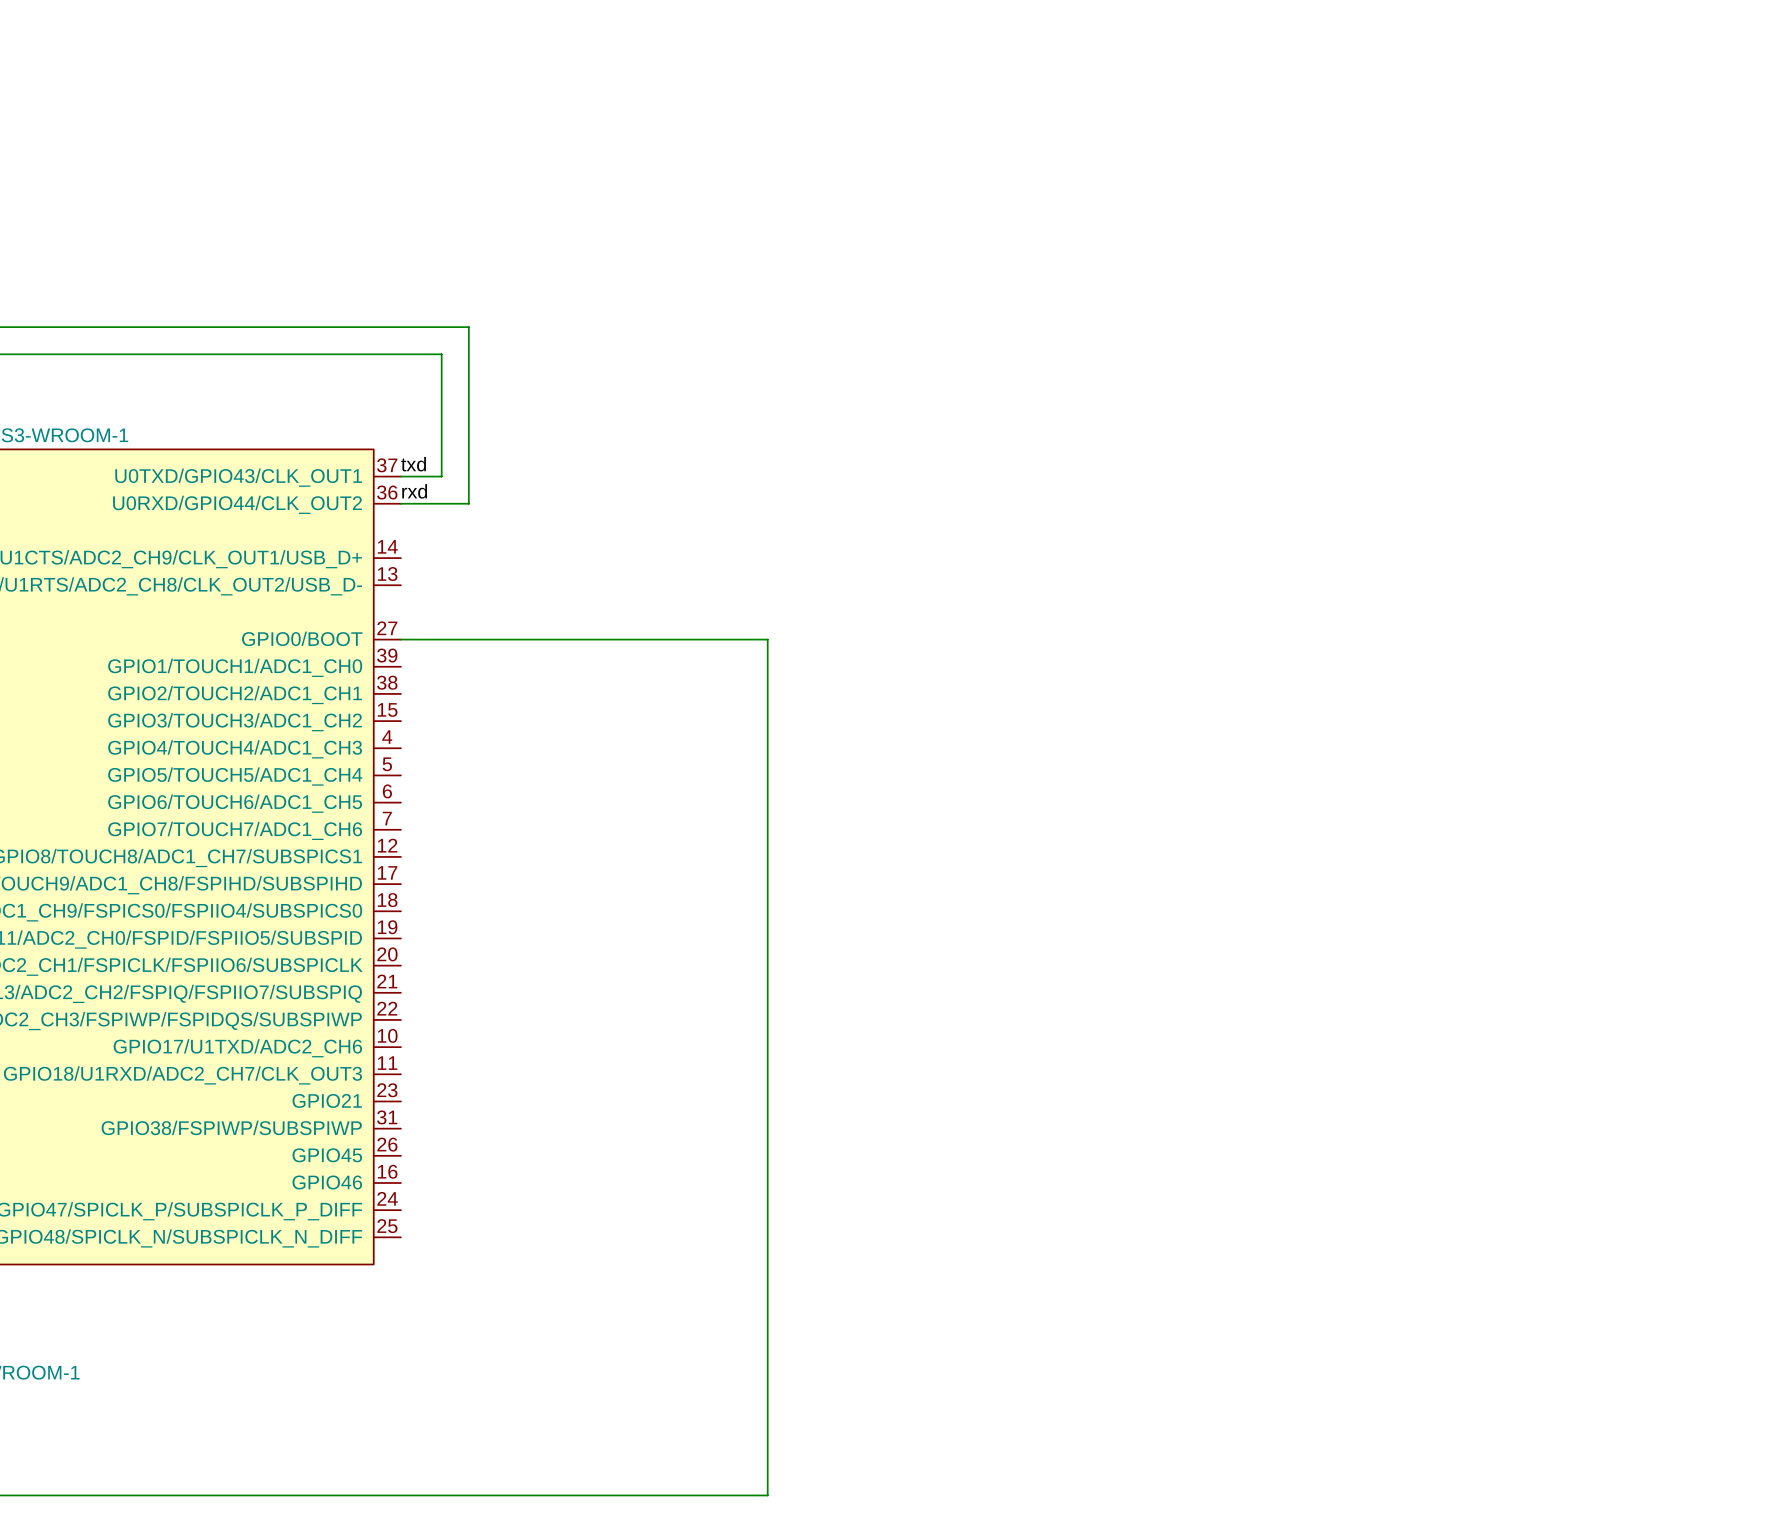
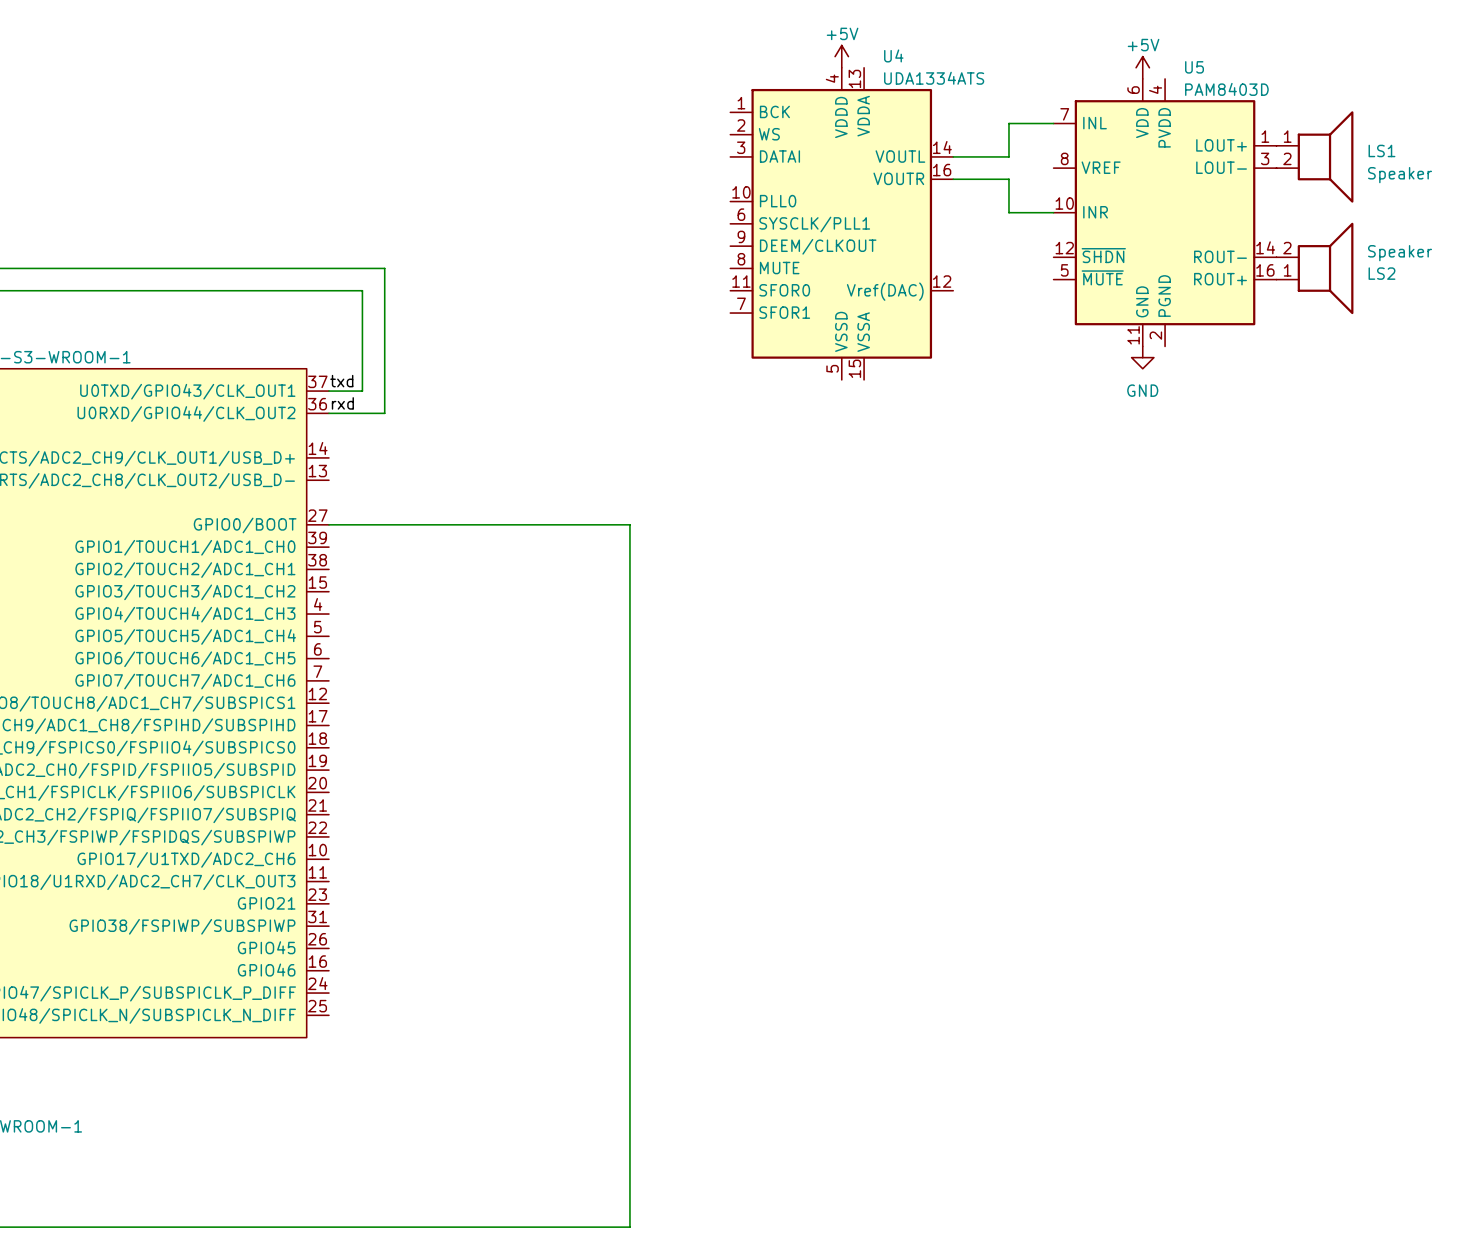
power symbol: none -> +5V (841, 56)
power symbol: none -> +5V (1142, 67)
wire: none -> (1053, 123) (1008, 123) (1008, 156) (953, 156)
LS1: none -> Speaker (1314, 156)
wire: none -> (953, 179) (1008, 179) (1008, 212) (1053, 212)
U5: none -> PAM8403D (1165, 212)
U4: none -> UDA1334ATS (841, 223)
LS2: none -> Speaker (1314, 268)
power symbol: none -> GND (1142, 357)

